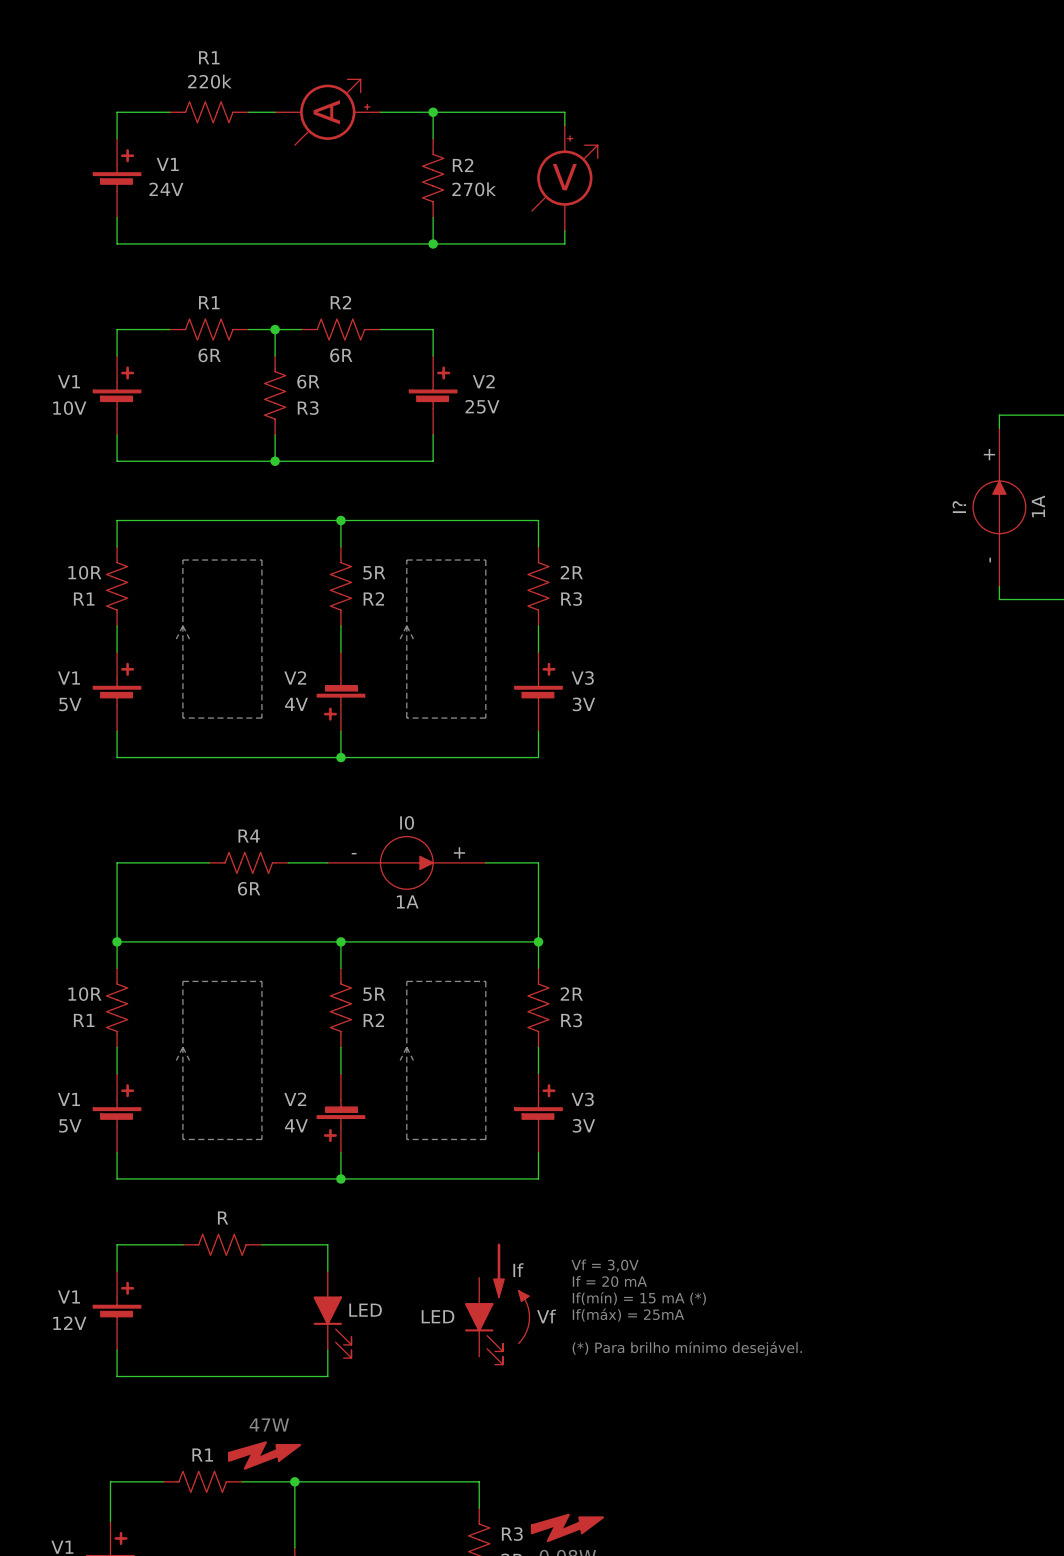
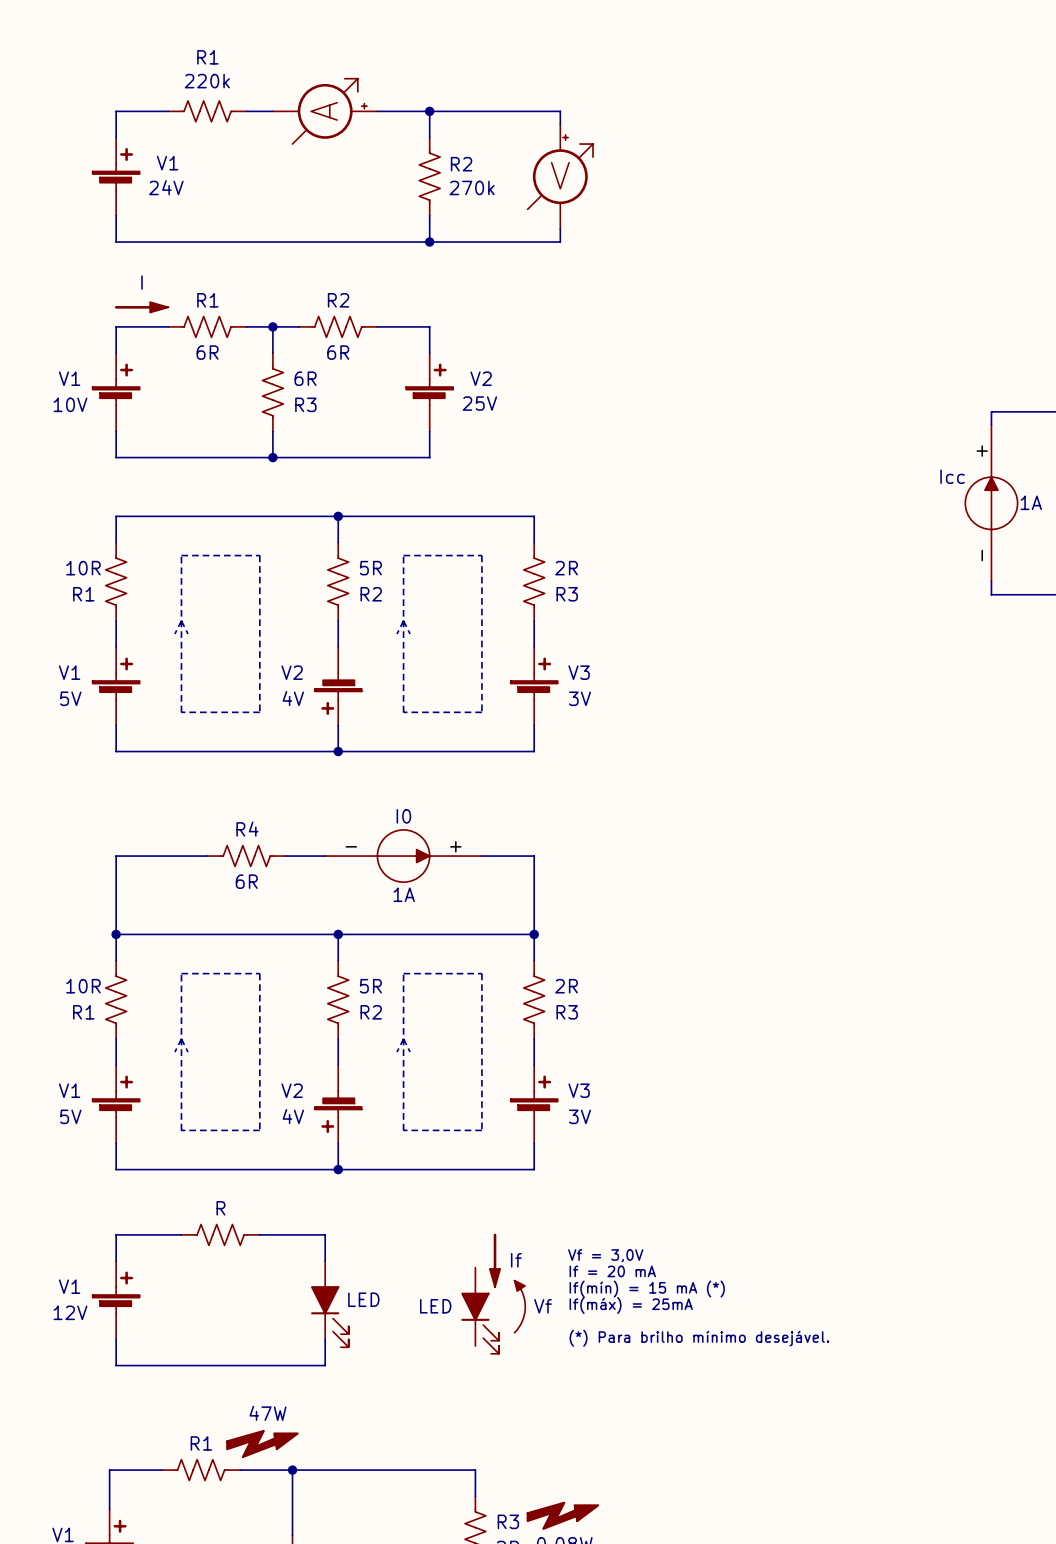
I: none -> (141, 307)
I? value rotation: 0° (1038, 506) -> 90° clockwise (1031, 502)
I? name: I? (959, 507) -> Icc (952, 476)

